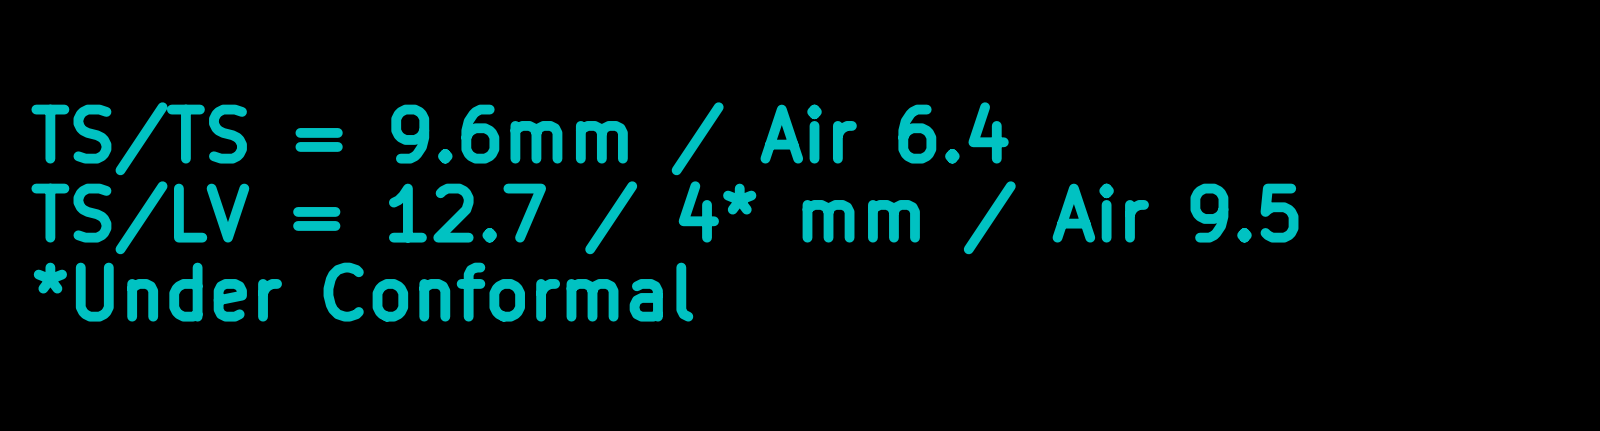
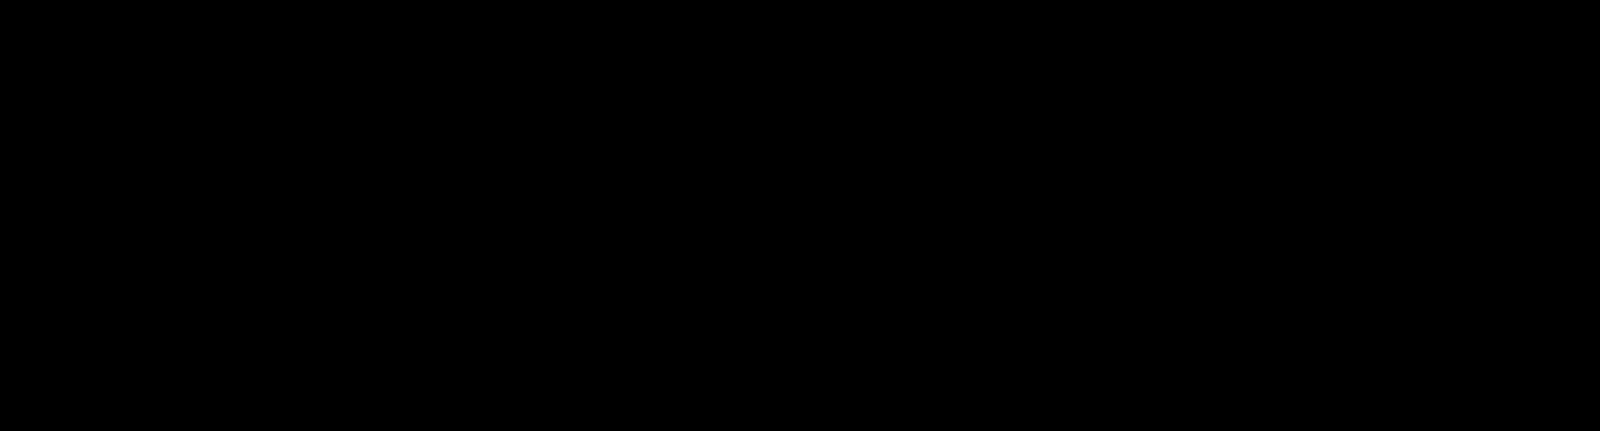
text: TS/TS = 9.6mm / Air 6.4 (520, 138) -> none
text: TS/LV = 12.7 / 4* mm / Air 9.5 (664, 217) -> none
text: *Under Conformal (363, 292) -> none

